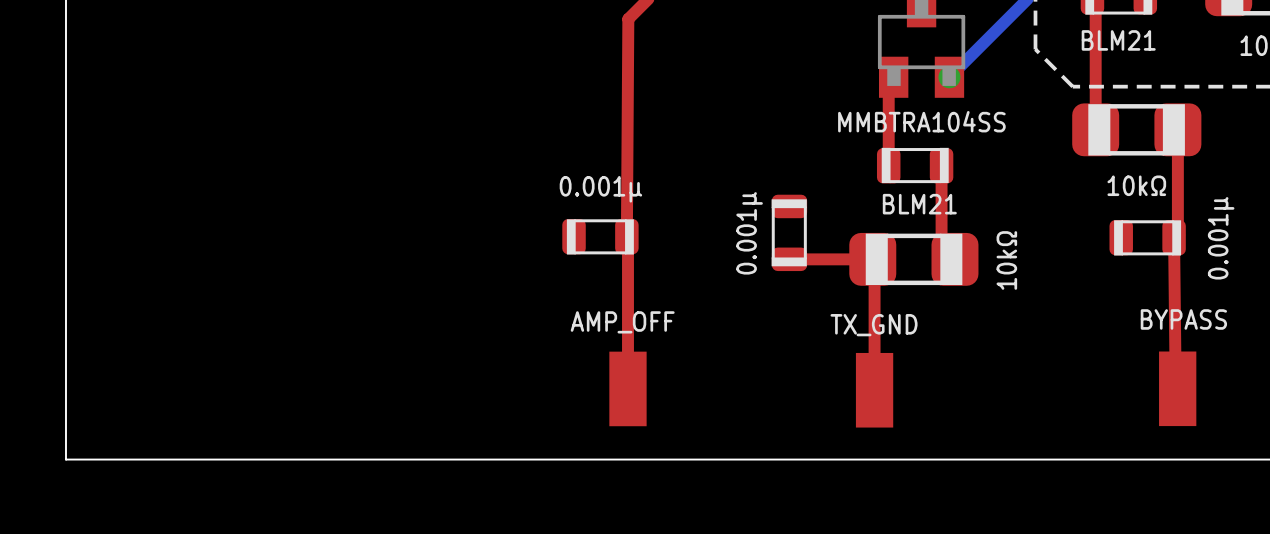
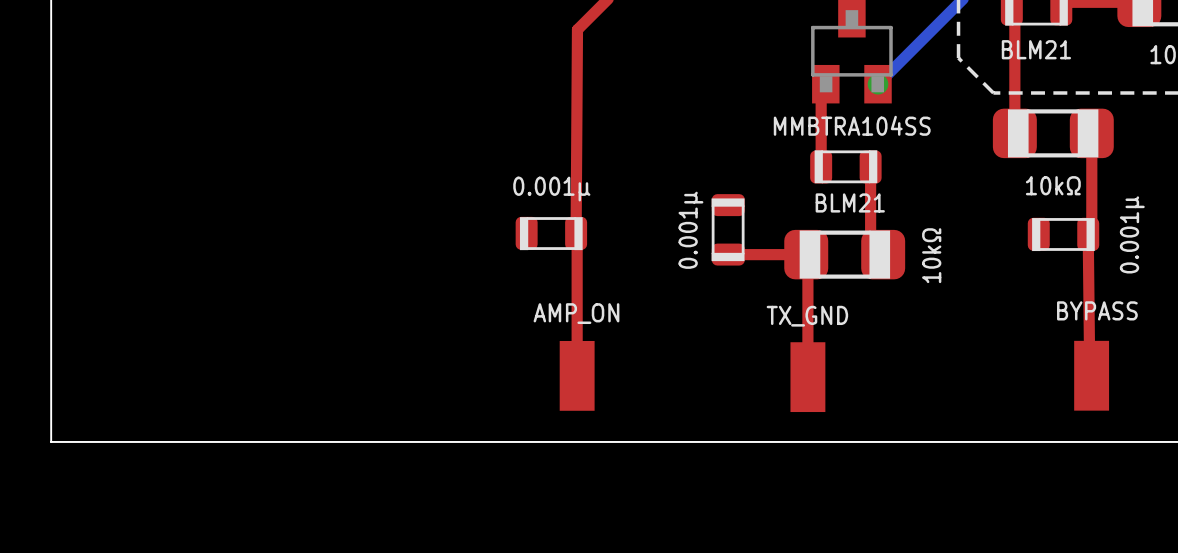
AMP_OFF name: AMP_OFF (622, 322) -> AMP_ON (576, 313)

